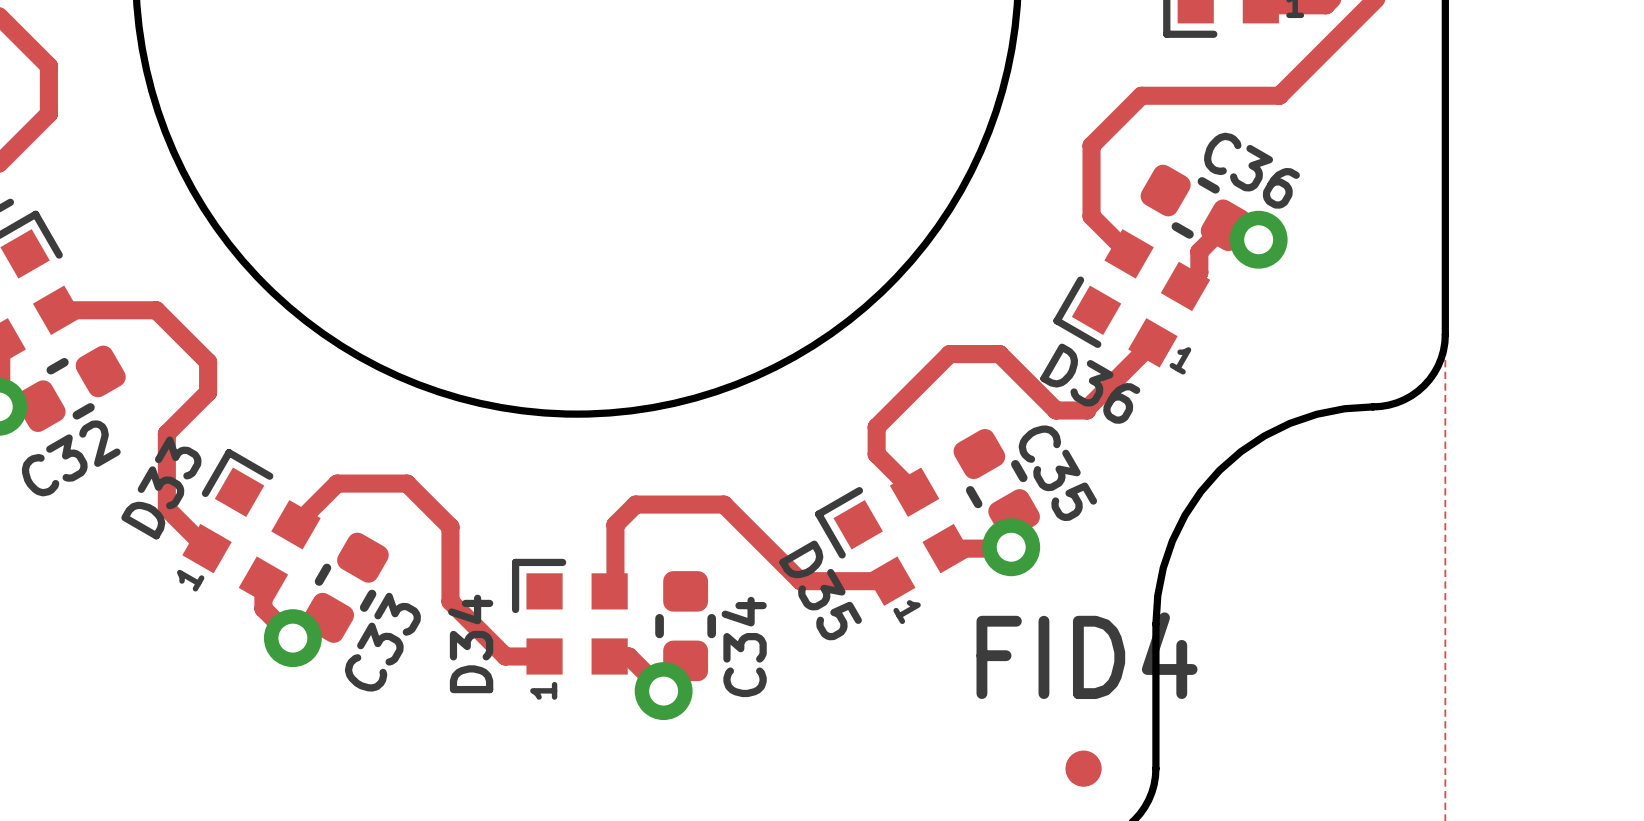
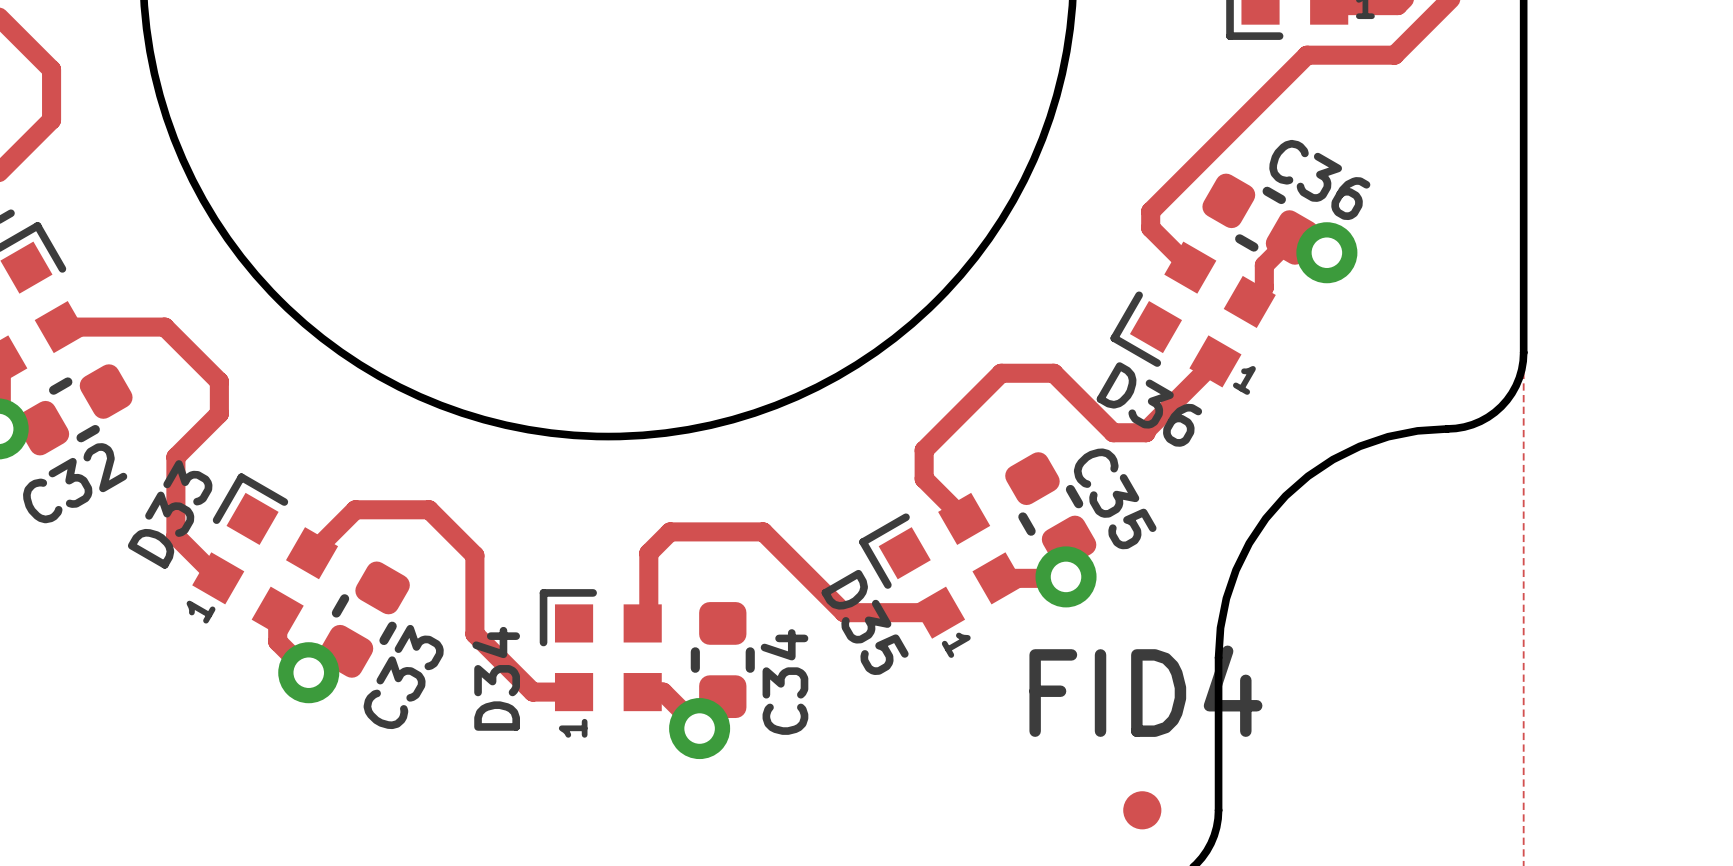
track: (1322, 52) (1279, 95) (1141, 95) (1091, 145) (1091, 200) -> (1394, 55) (1307, 55) (1150, 211)

